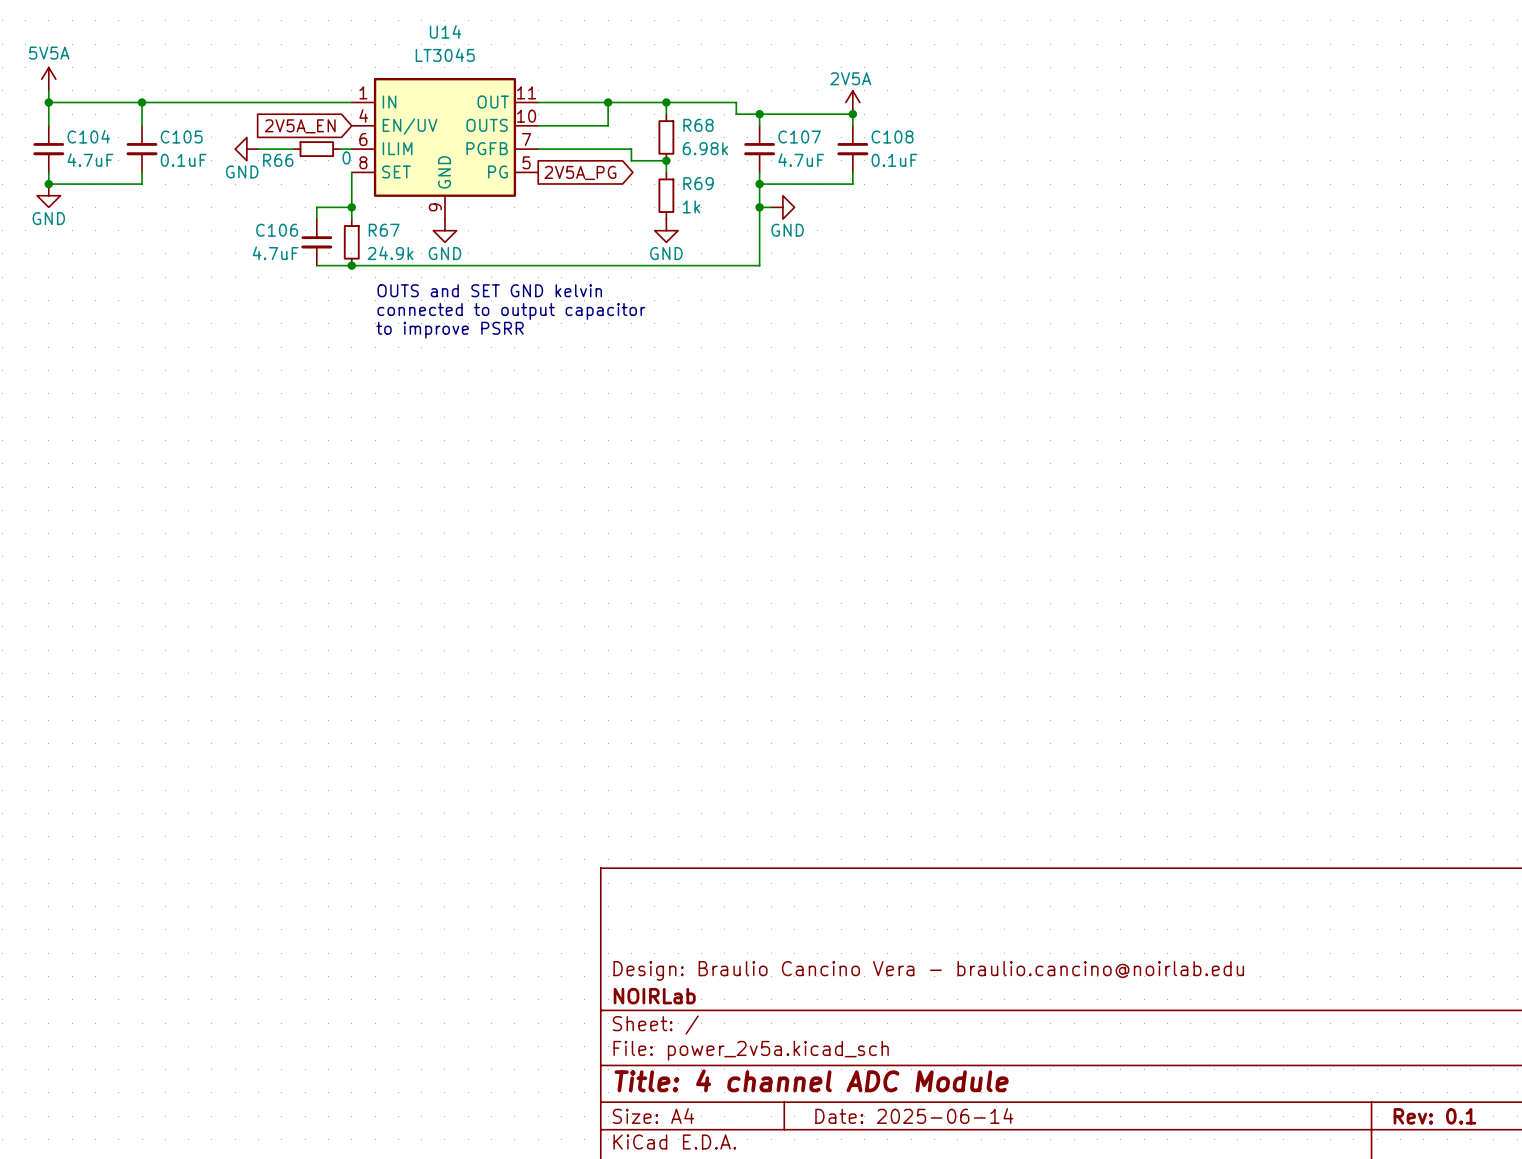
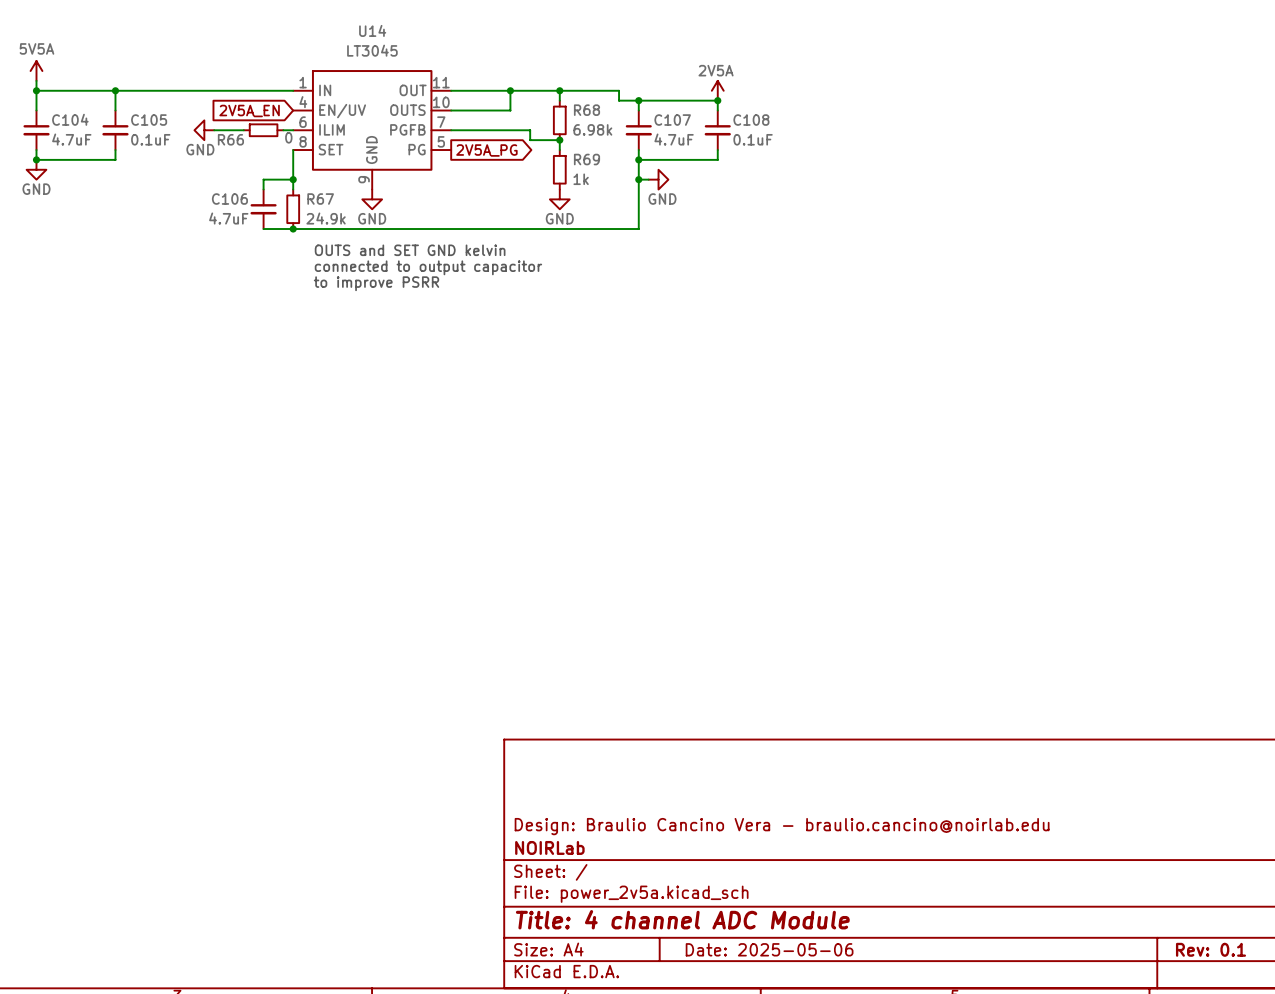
title block: Date: 2025-06-14 (914, 1116) -> Date: 2025-05-06 (769, 949)

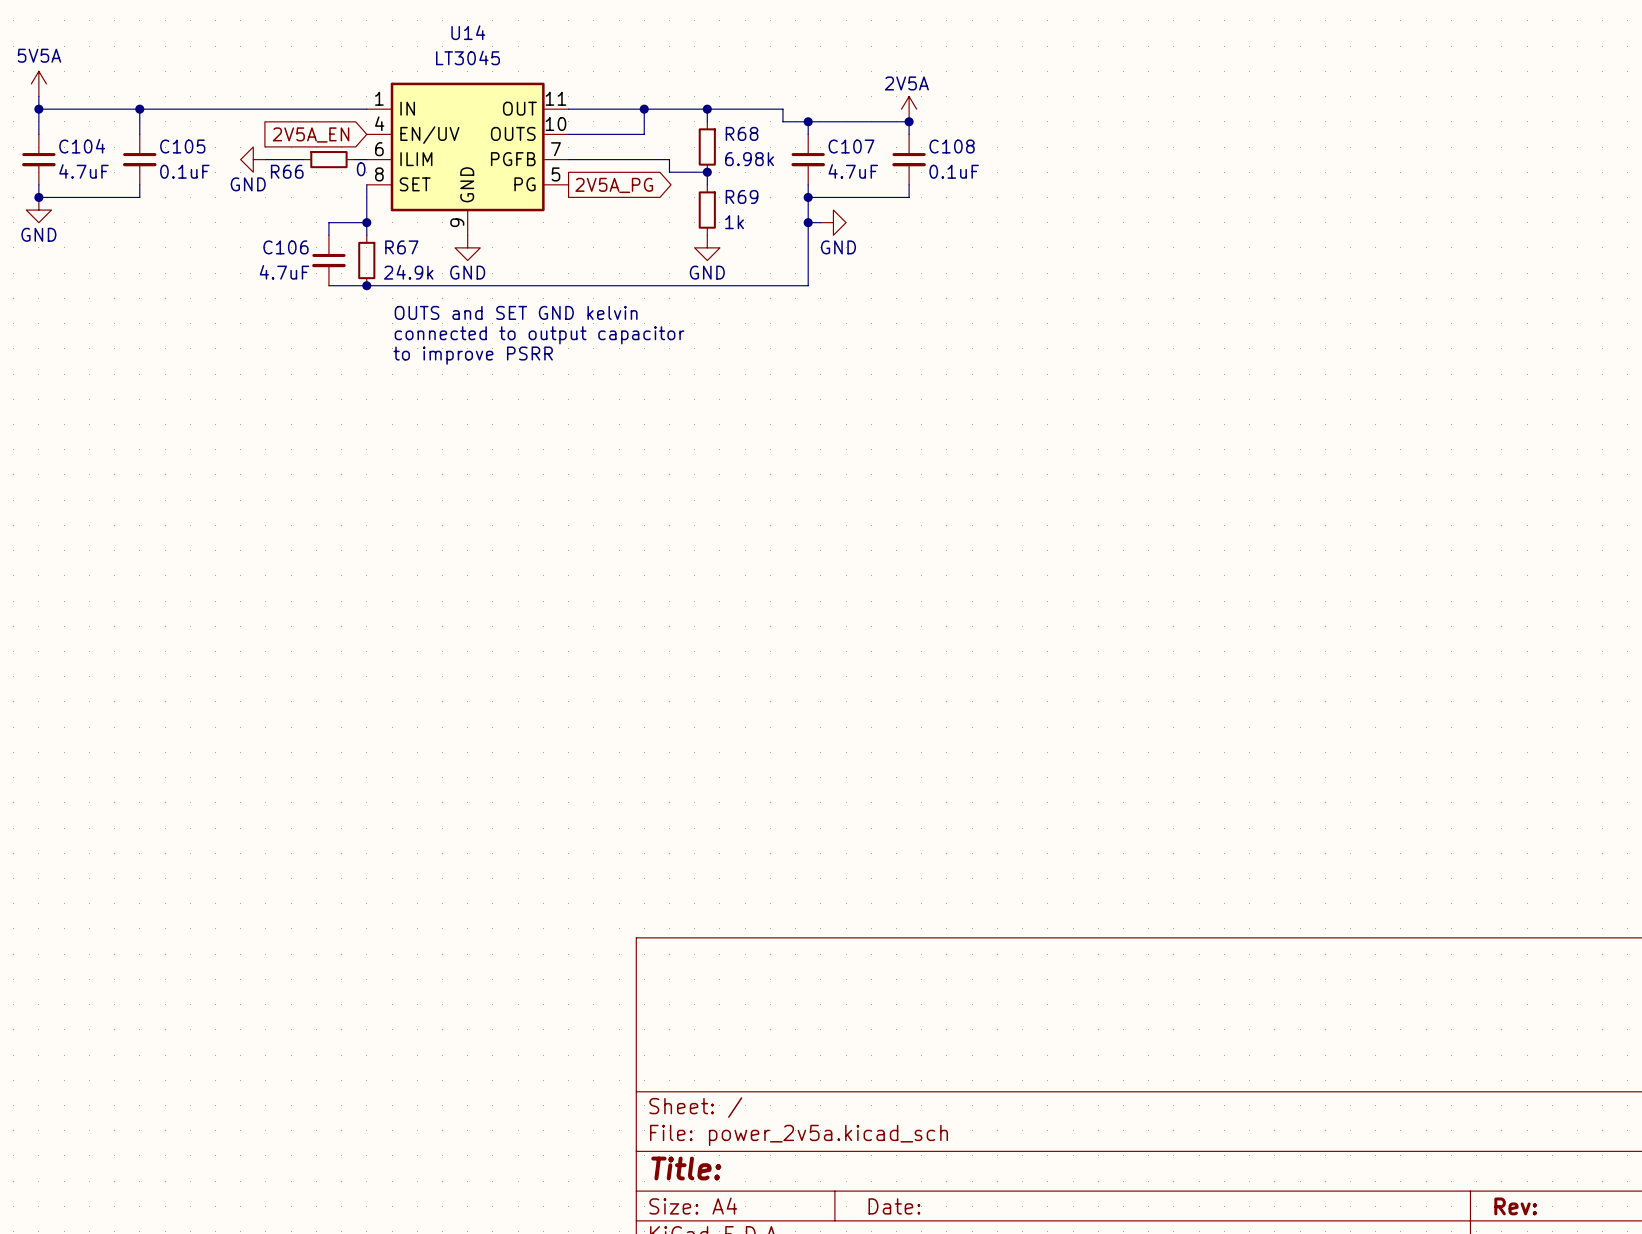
title block: Design: Braulio Cancino Vera - braulio.cancino@noirlab.edu (782, 826) -> none
title block: NOIRLab (549, 847) -> none
title block: Title: 4 channel ADC Module (682, 919) -> Title: (686, 1168)
title block: Date: 2025-05-06 (769, 949) -> Date: (894, 1206)
title block: Rev: 0.1 (1210, 949) -> Rev: (1515, 1206)

